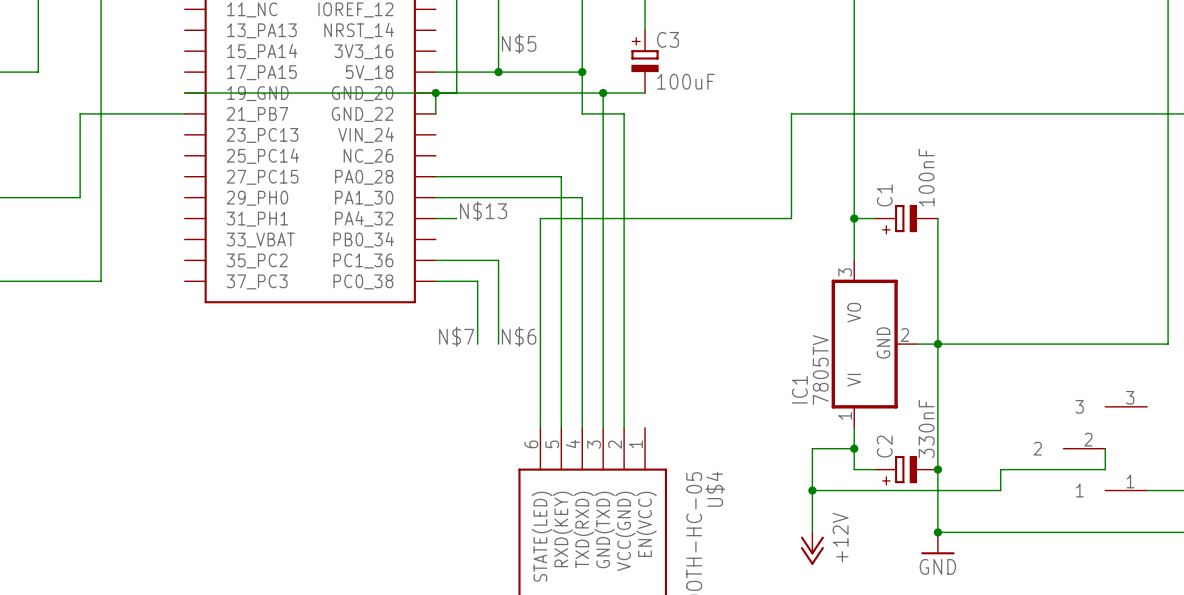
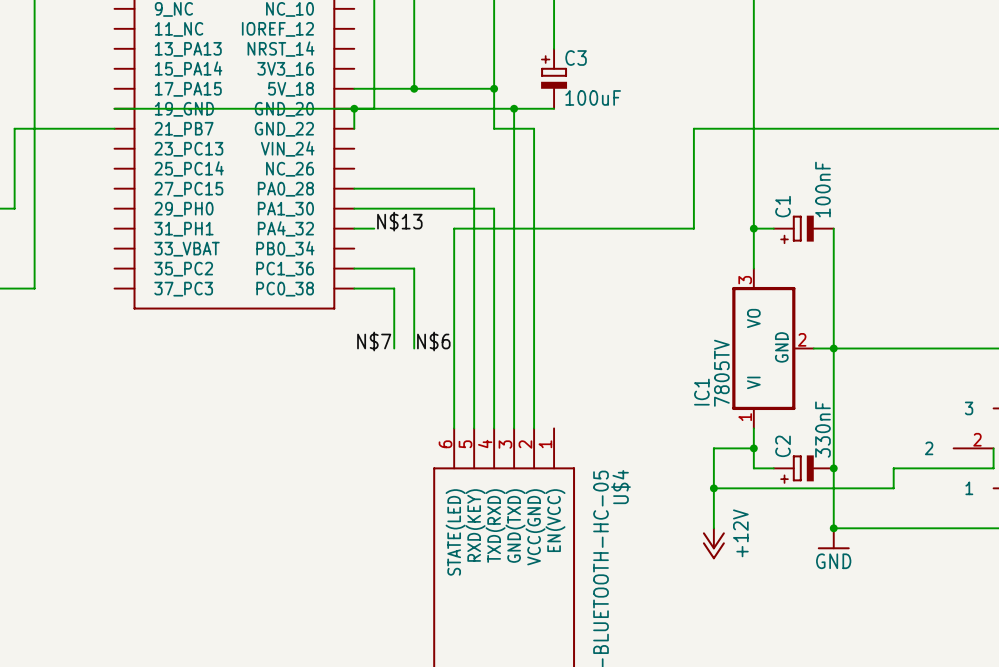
label: N$5 (519, 43) -> none

